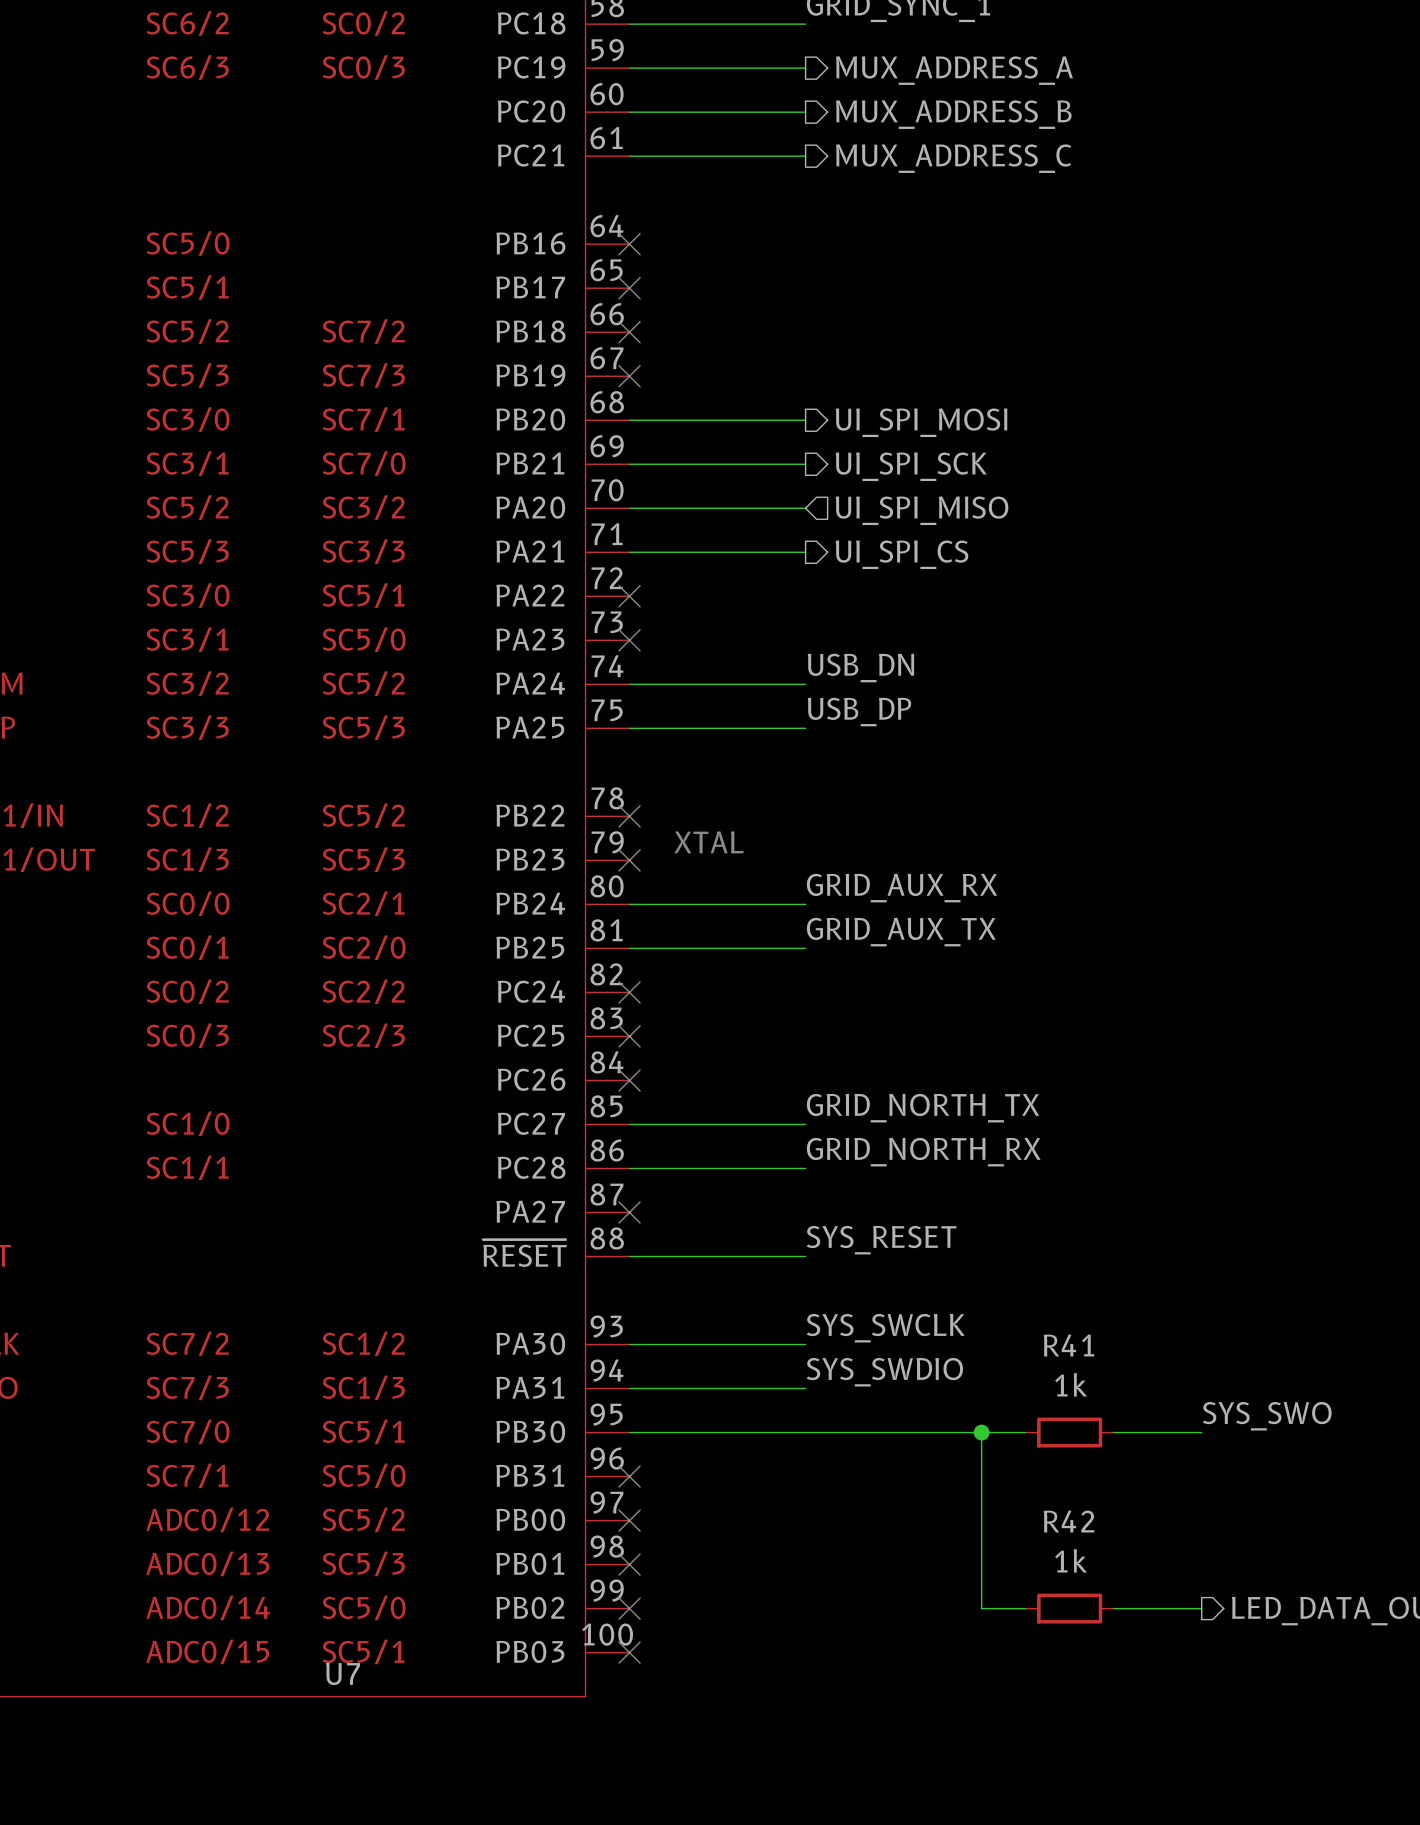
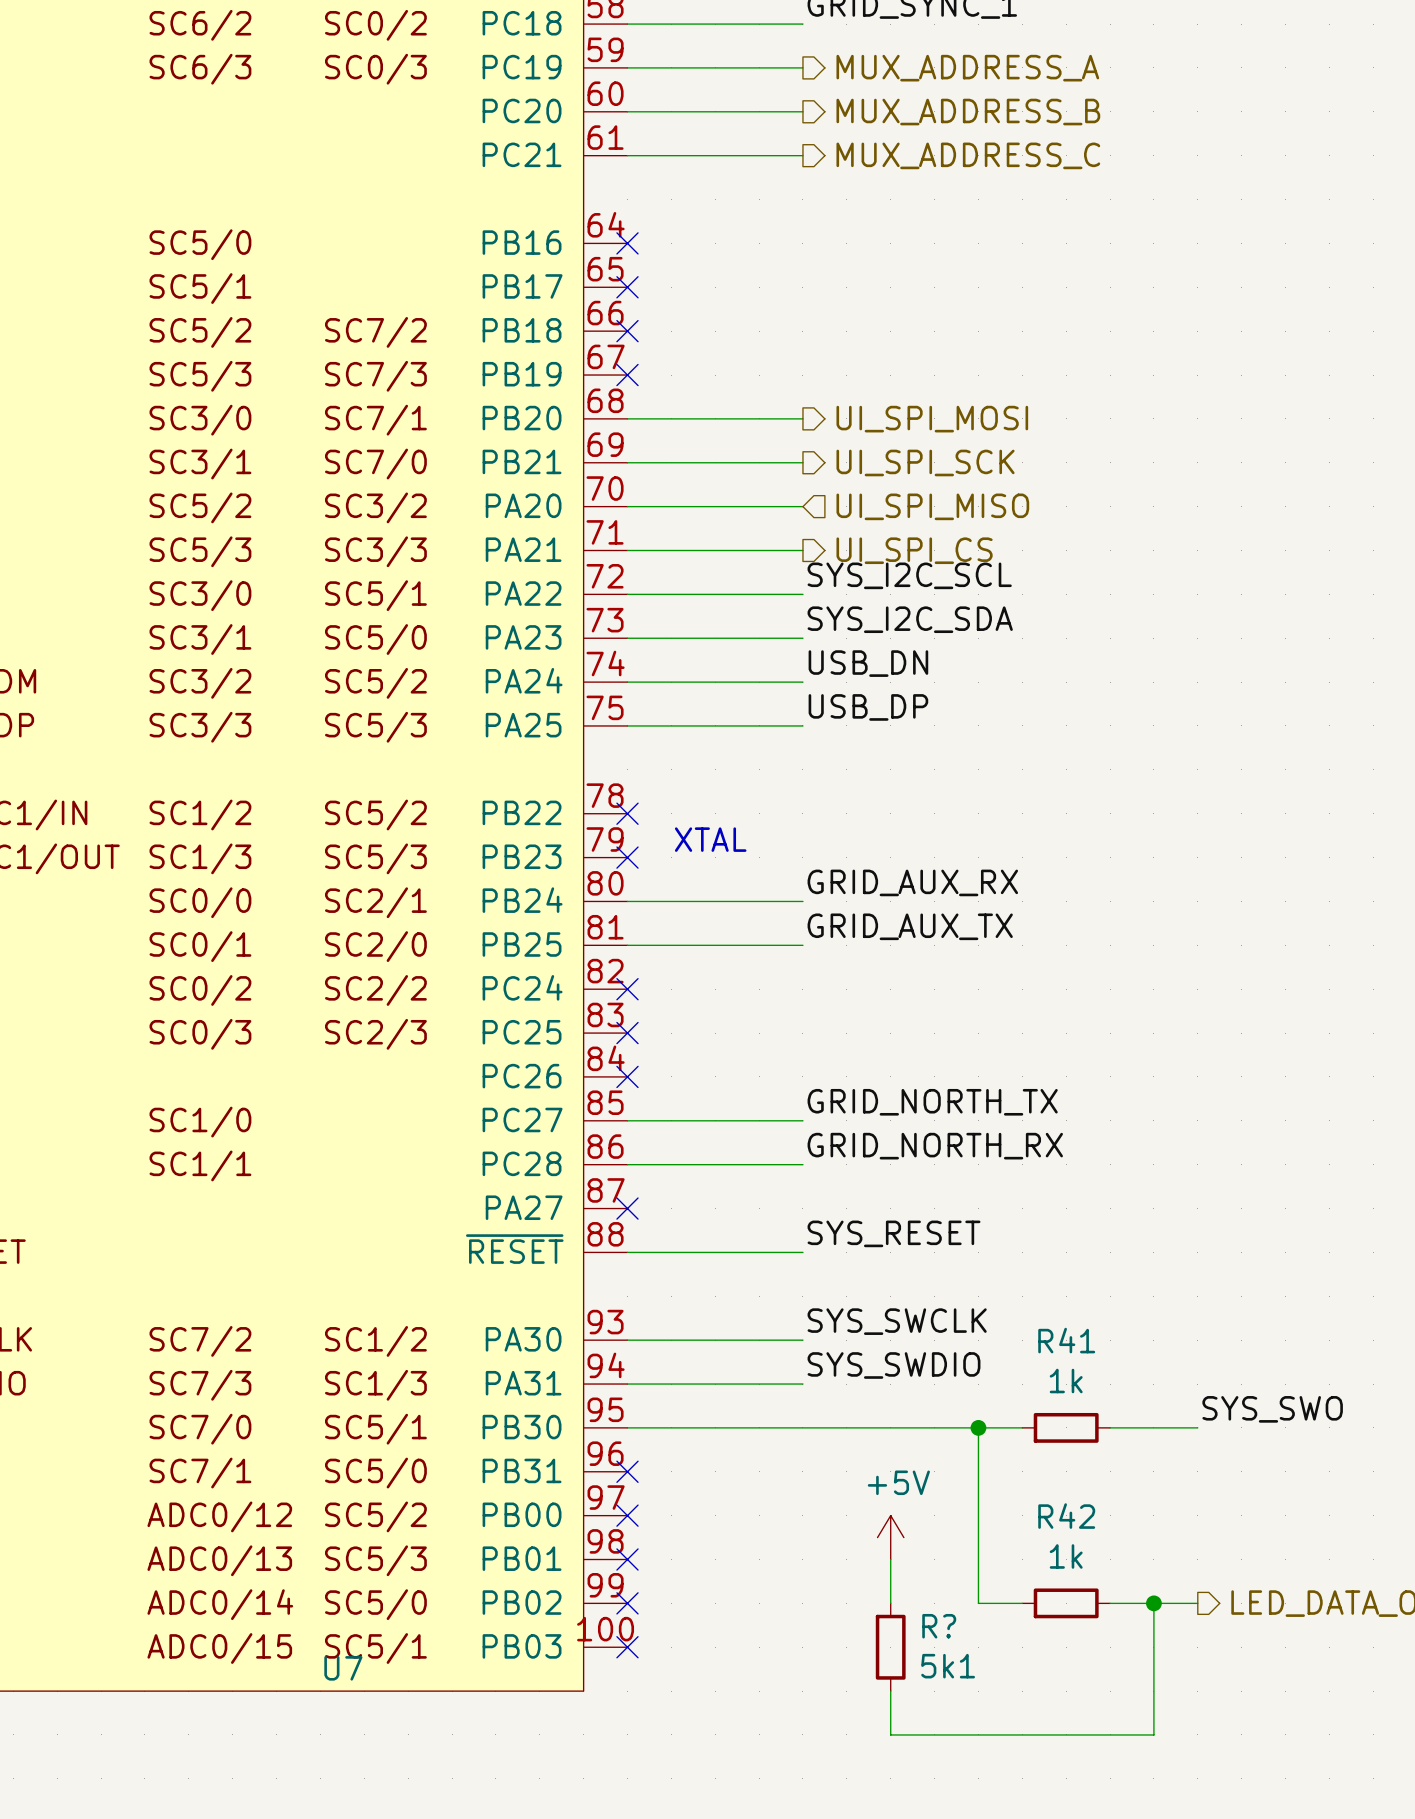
label: none -> SYS_I2C_SCL (909, 575)
wire: none -> (627, 594) (802, 594)
no-connect mark: (629, 596) -> none
label: none -> SYS_I2C_SDA (910, 619)
wire: none -> (627, 638) (802, 638)
no-connect mark: (629, 640) -> none
power symbol: none -> +5V (890, 1537)
wire: none -> (890, 1559) (890, 1603)
wire: none -> (1153, 1603) (1153, 1734) (890, 1734) (890, 1691)
junction: none -> (1153, 1603)
R?: none -> 5k1 (890, 1647)

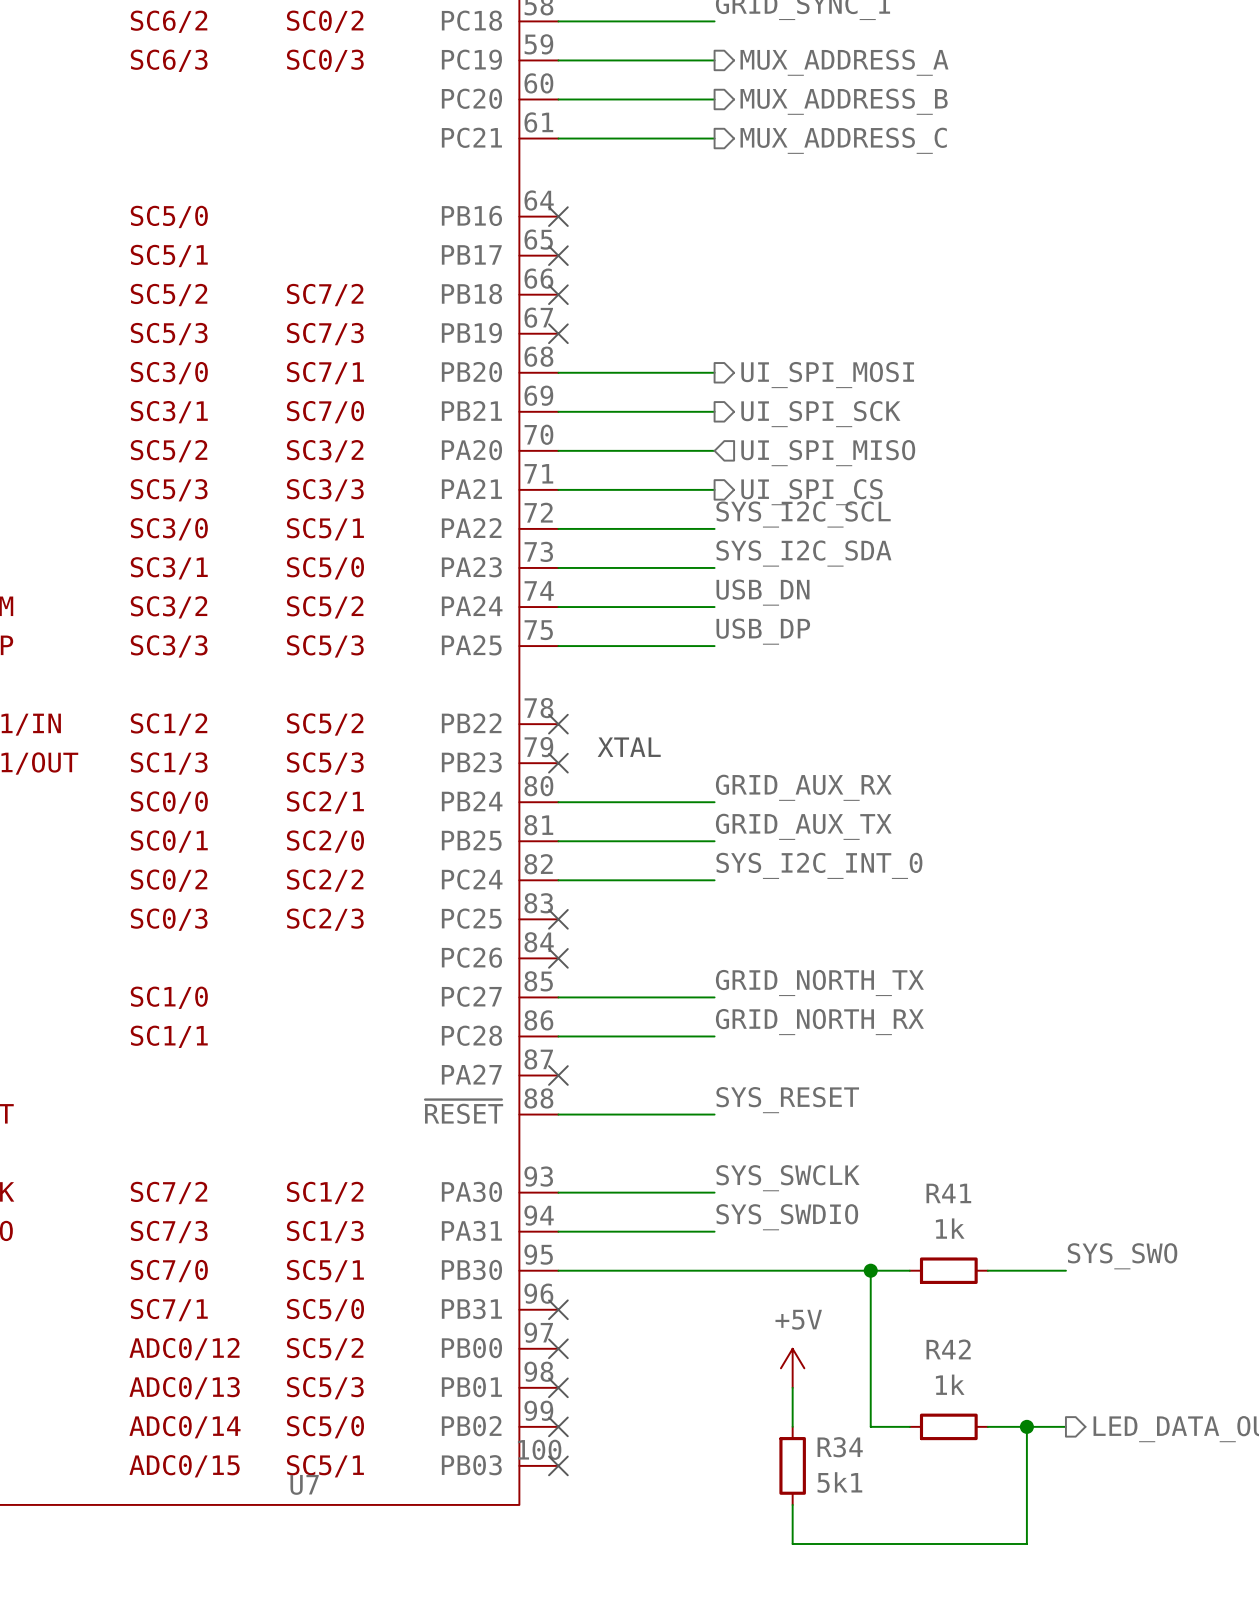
label: none -> SYS_I2C_INT_0 (819, 865)
wire: none -> (558, 880) (714, 880)
no-connect mark: (627, 989) -> none
R? name: R? (939, 1626) -> R34 (840, 1447)

